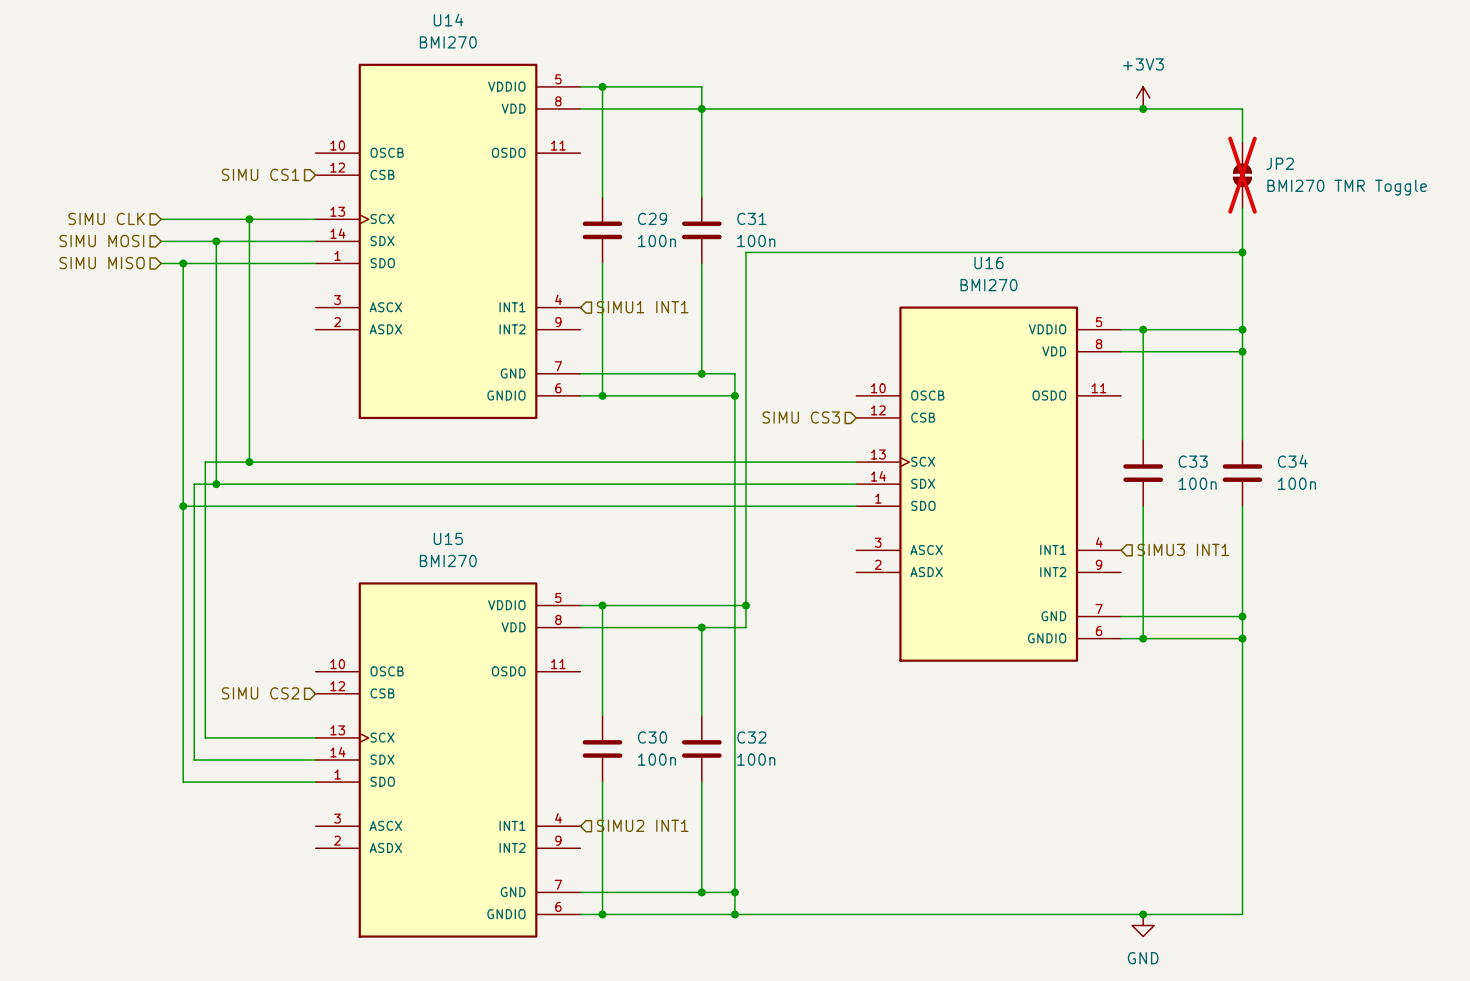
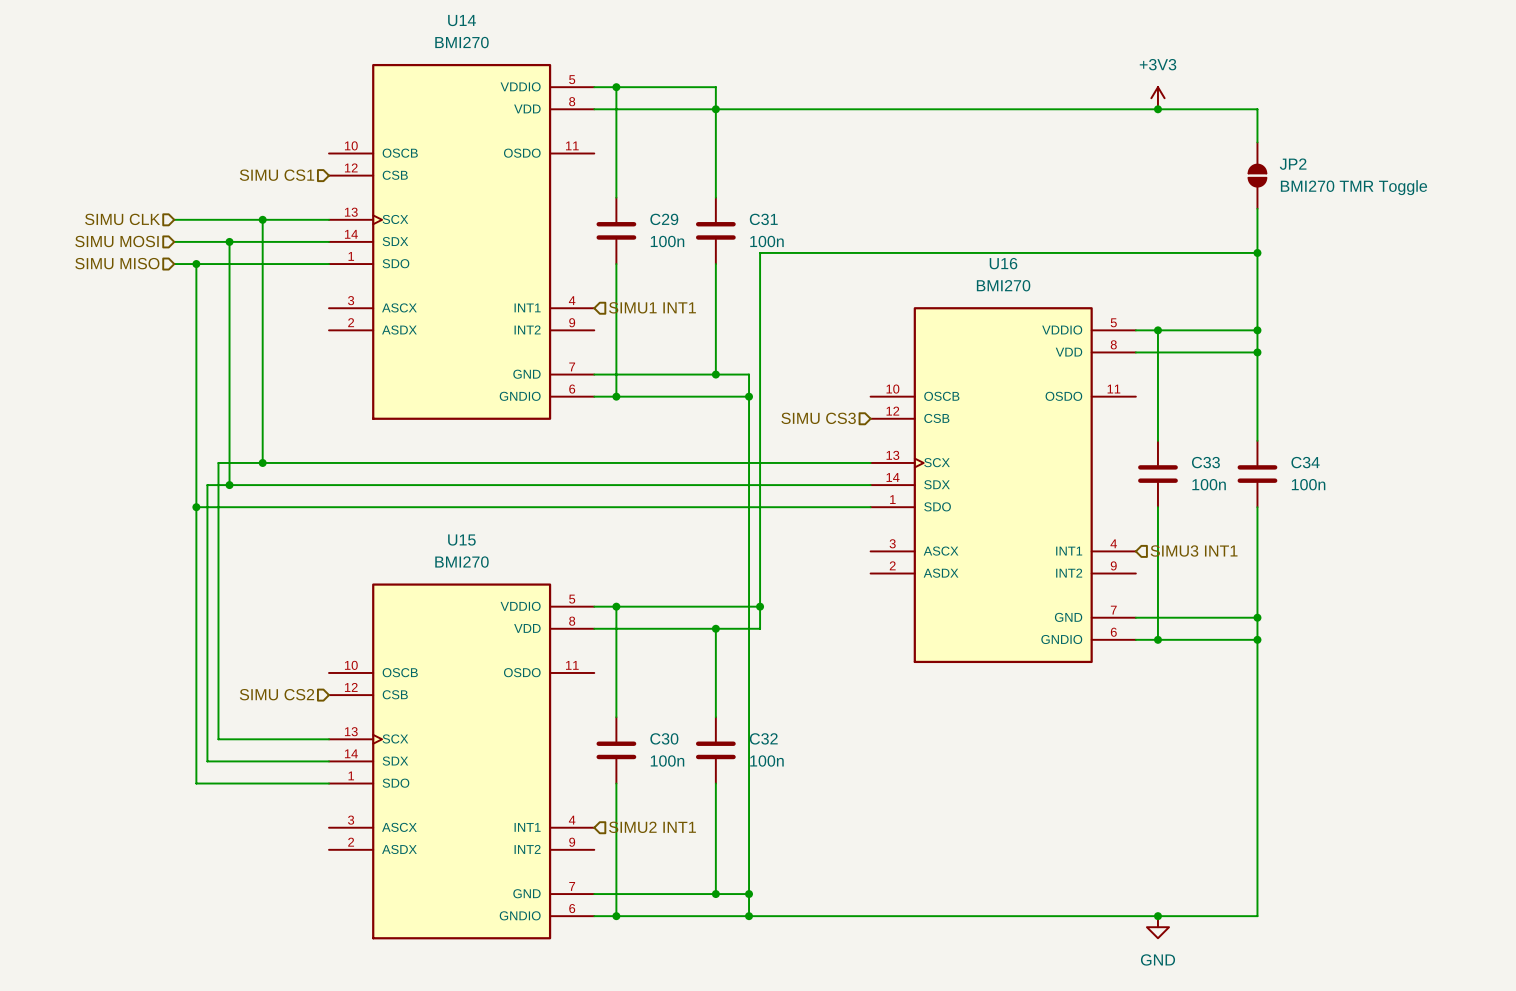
JP2 do-not-place cross: (1242, 175) -> none

